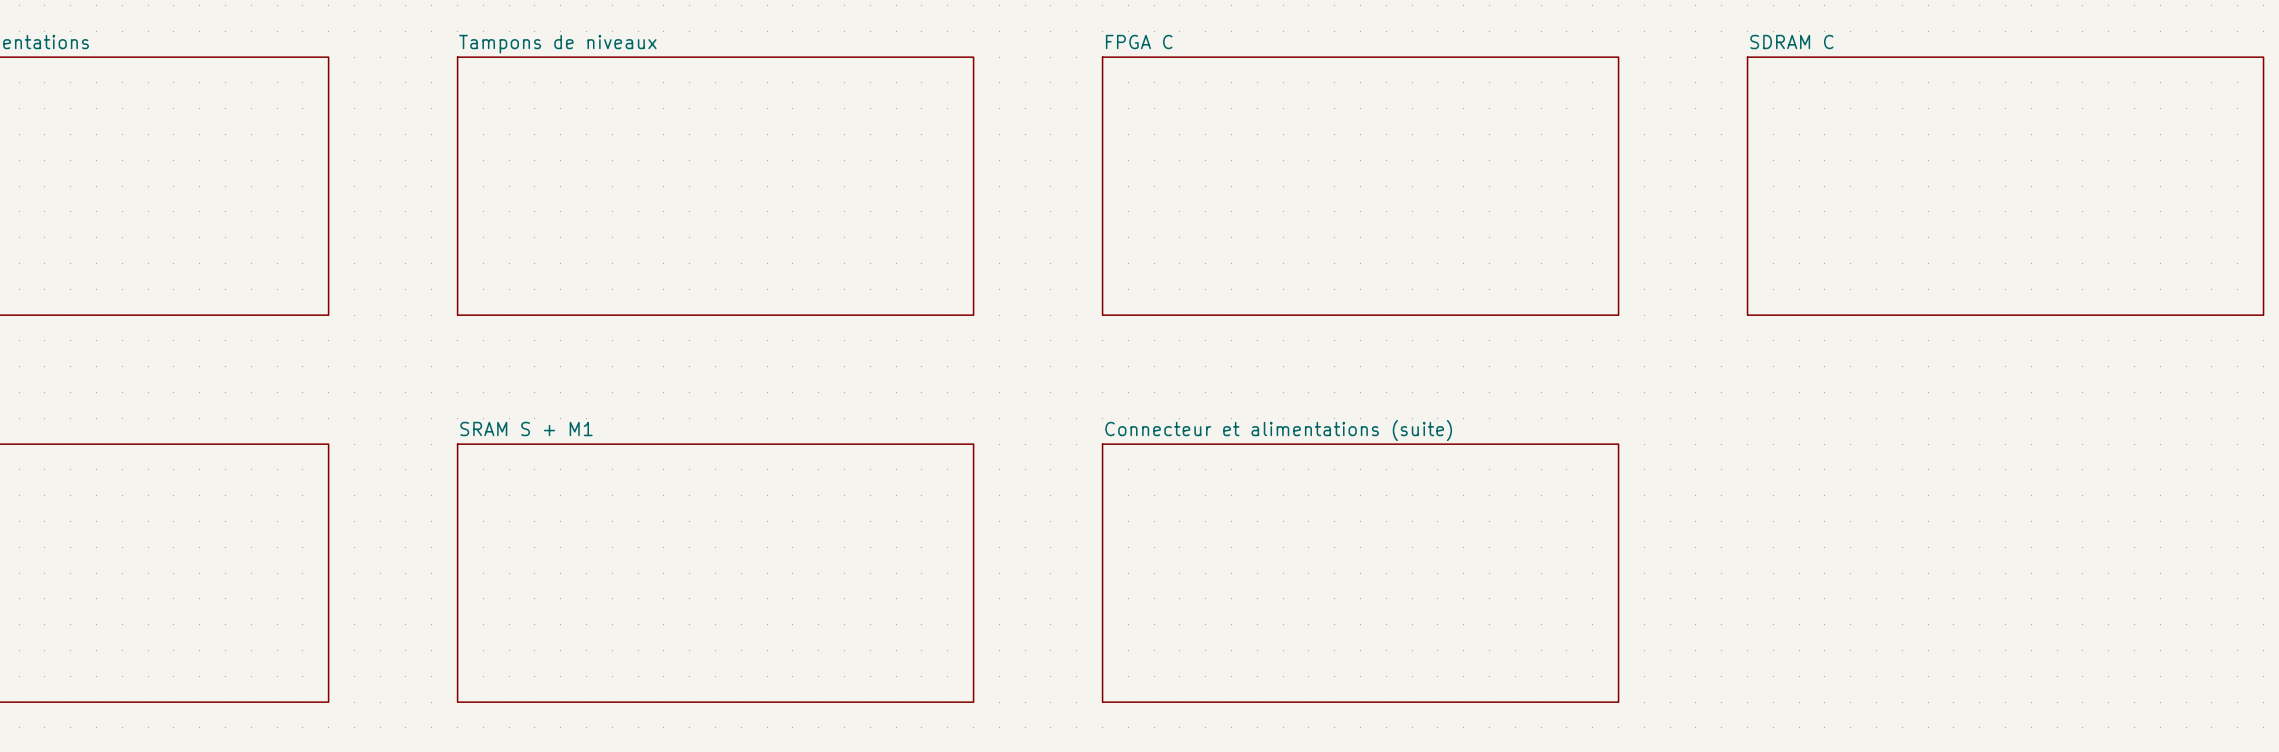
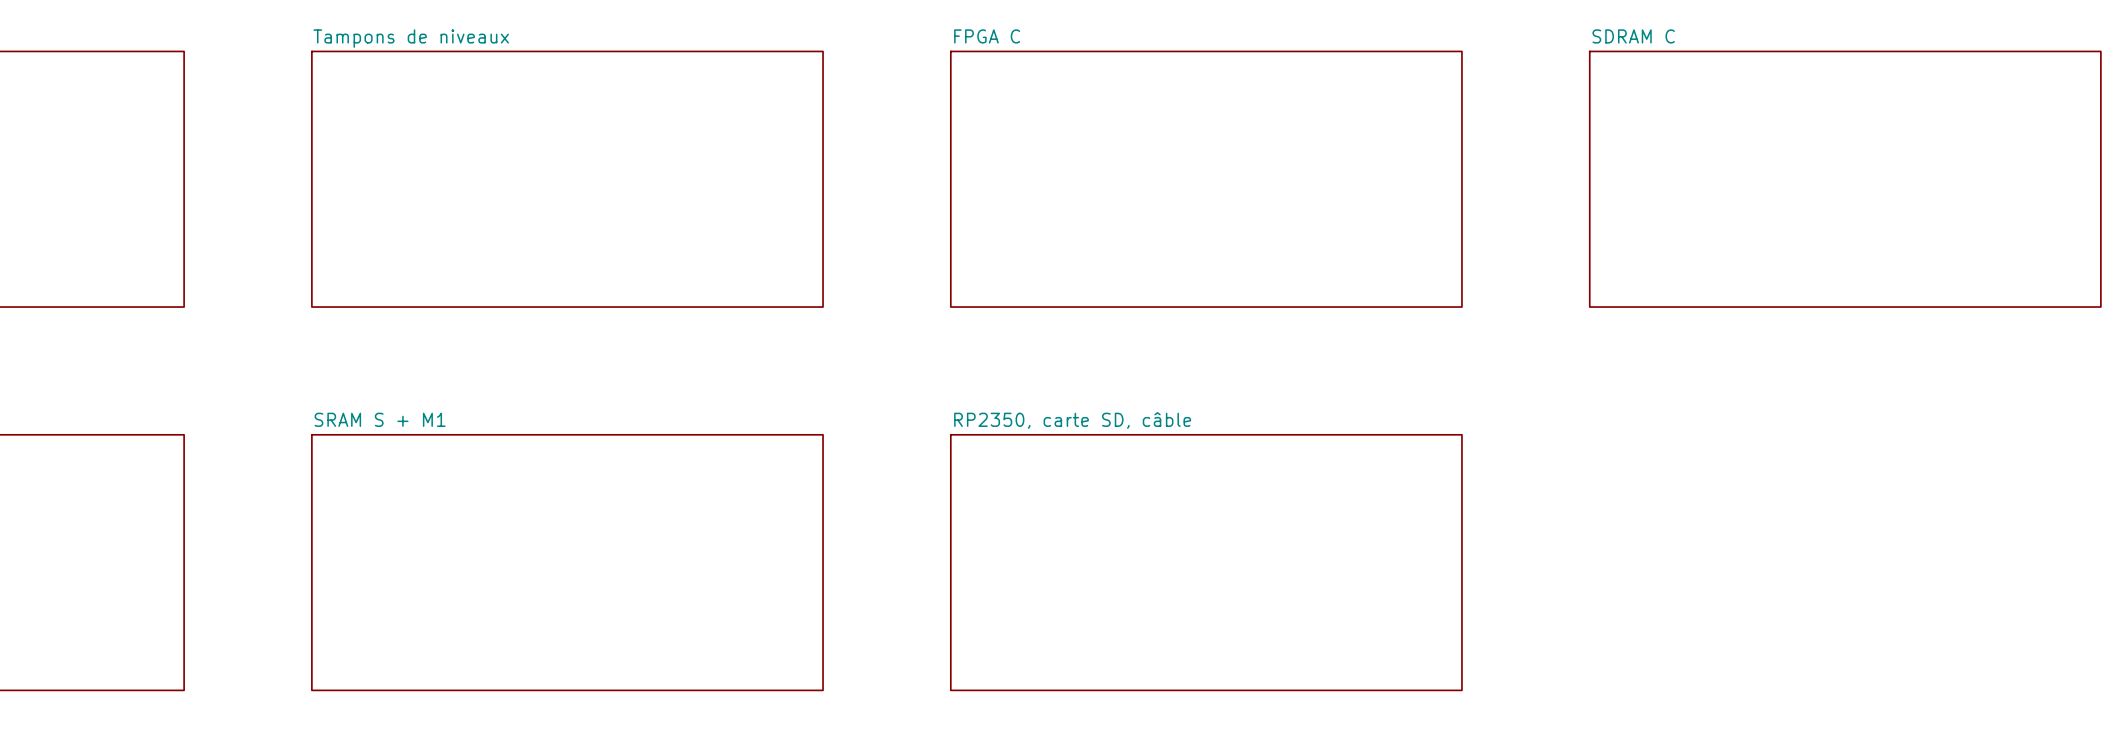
sheet RP2350, carte SD, câble name: Connecteur et alimentations (suite) (1278, 430) -> RP2350, carte SD, câble (1072, 420)

